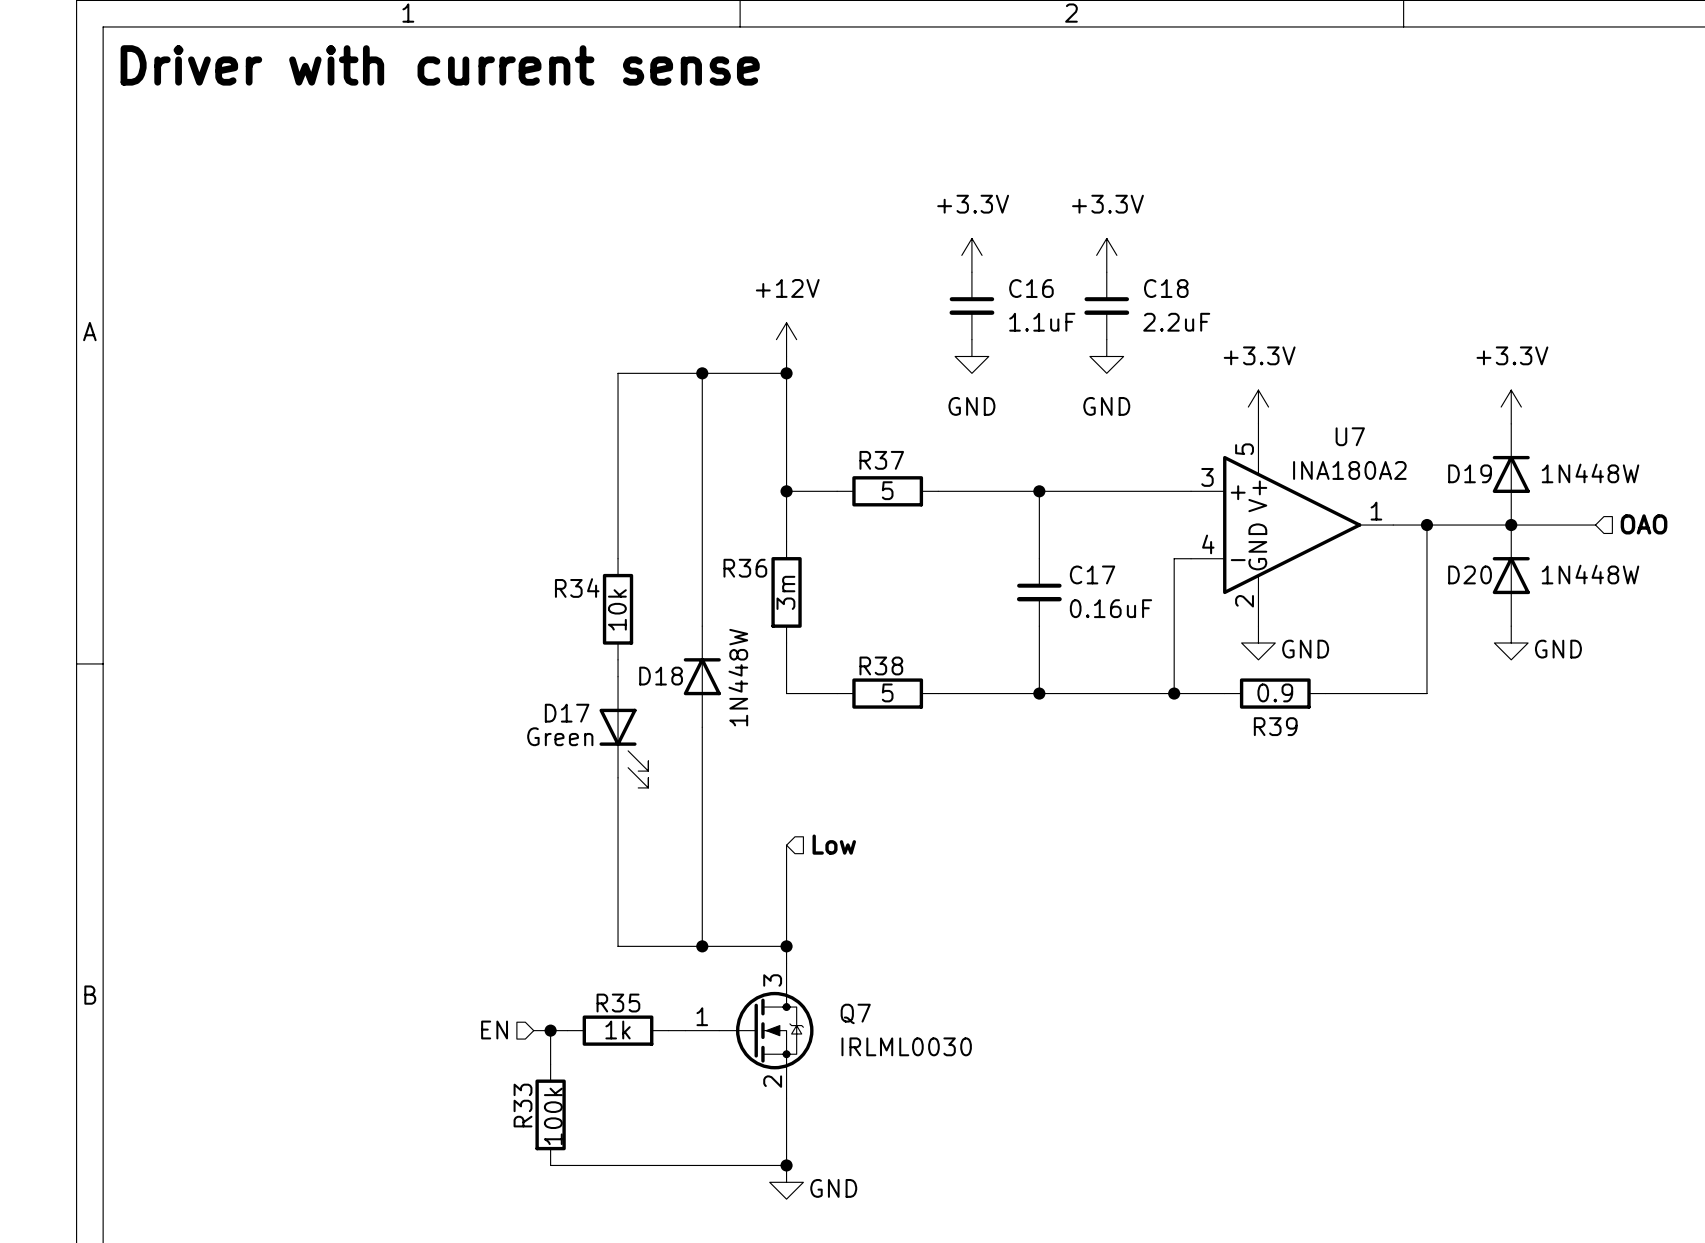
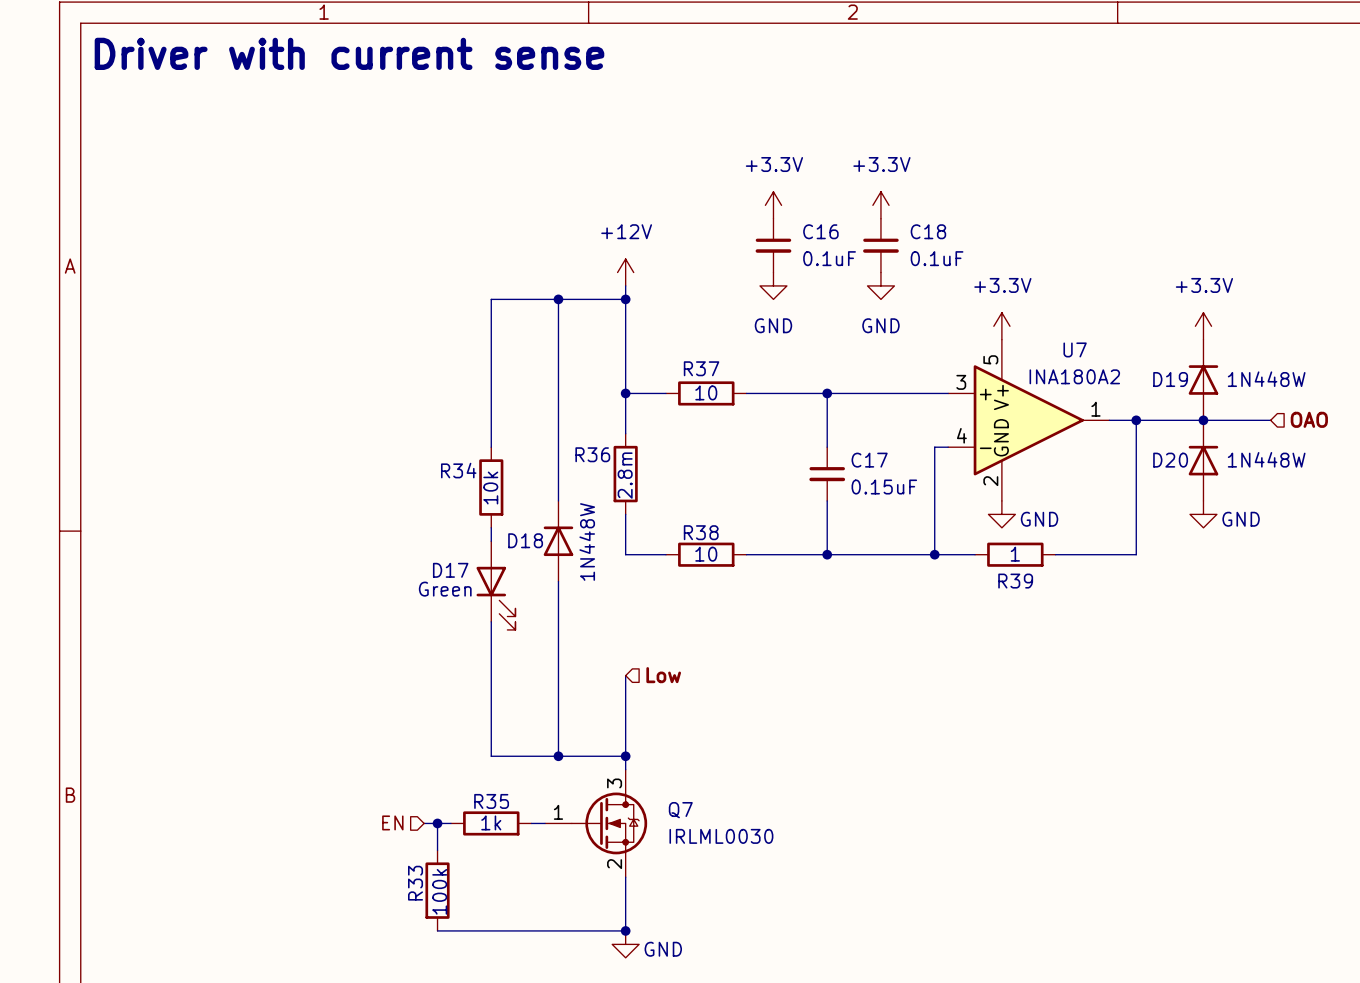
C16 value: 1.1uF (1042, 322) -> 0.1uF (829, 258)
C18 value: 2.2uF (1176, 322) -> 0.1uF (937, 258)
R37 value: 5 (887, 490) -> 10 (706, 392)
R36 value: 3m (785, 592) -> 2.8m (625, 475)
C17 value: 0.16uF (1110, 608) -> 0.15uF (884, 487)
R38 value: 5 (887, 692) -> 10 (706, 554)
R39 value: 0.9 (1275, 692) -> 1 (1015, 554)

